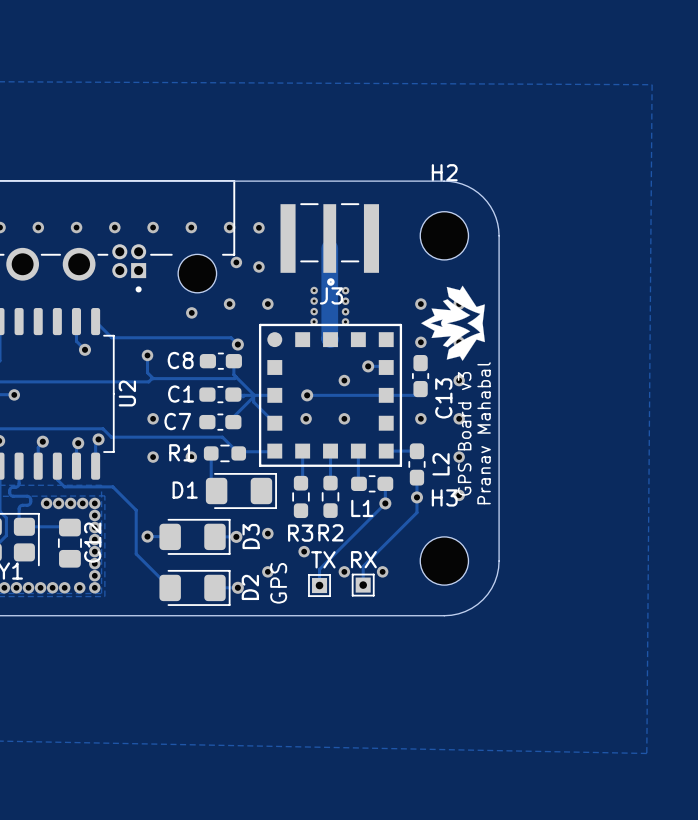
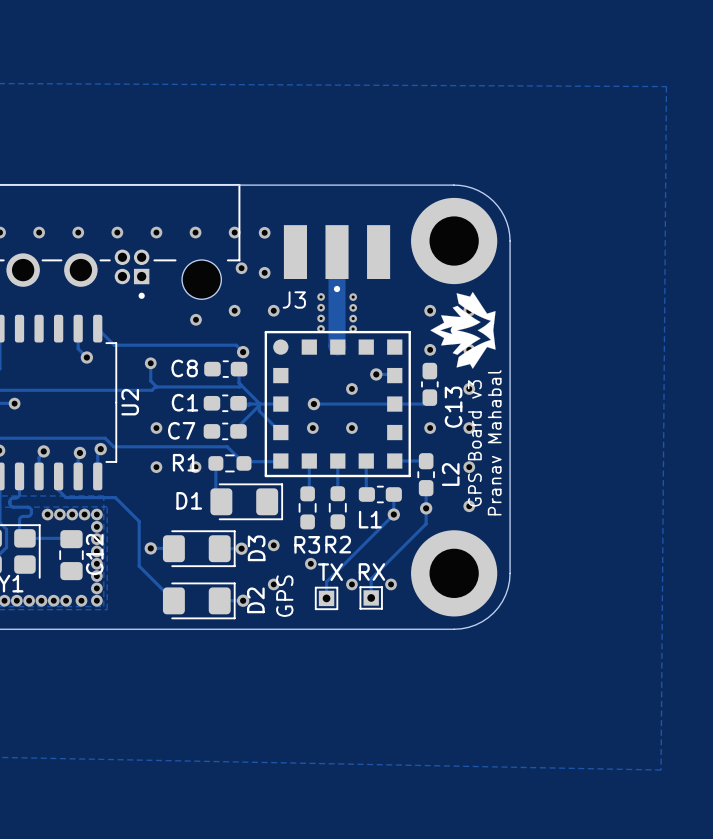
J3 footprint: [280, 203, 380, 286] -> [283, 225, 391, 293]
H2: (444, 235) -> none
part: none -> (454, 241)
J3 name position: J3 (331, 295) -> J3 (294, 299)
H3: (444, 561) -> none
part: none -> (454, 573)

